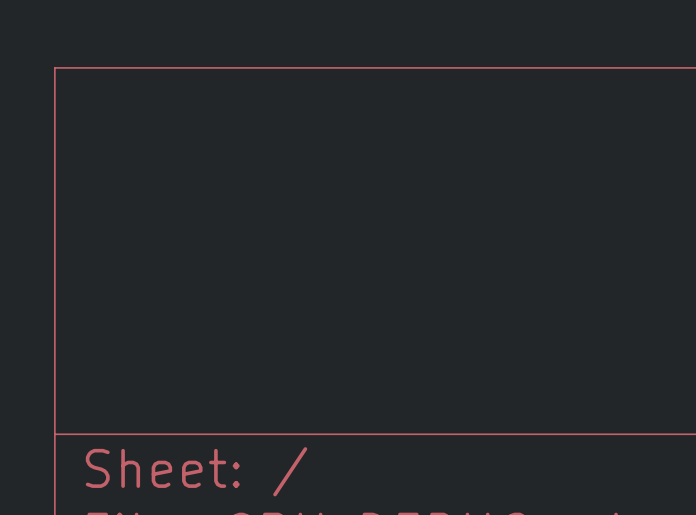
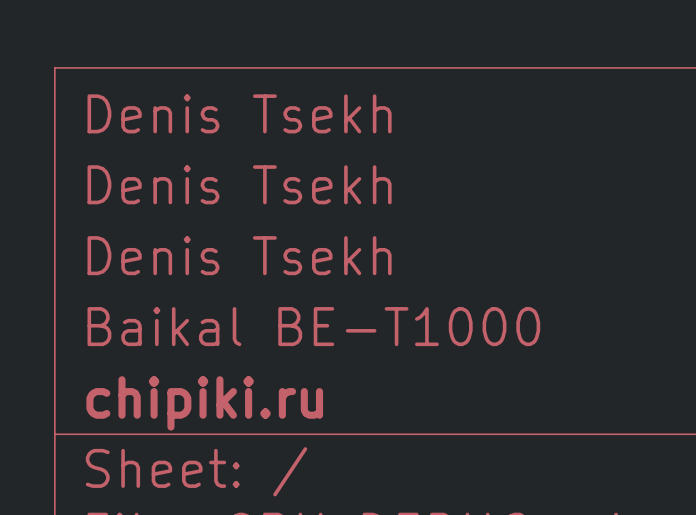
title block: none -> Denis Tsekh (239, 113)
title block: none -> Denis Tsekh (239, 184)
title block: none -> Denis Tsekh (239, 255)
title block: none -> Baikal BE-T1000 (313, 326)
title block: none -> chipiki.ru (204, 403)

